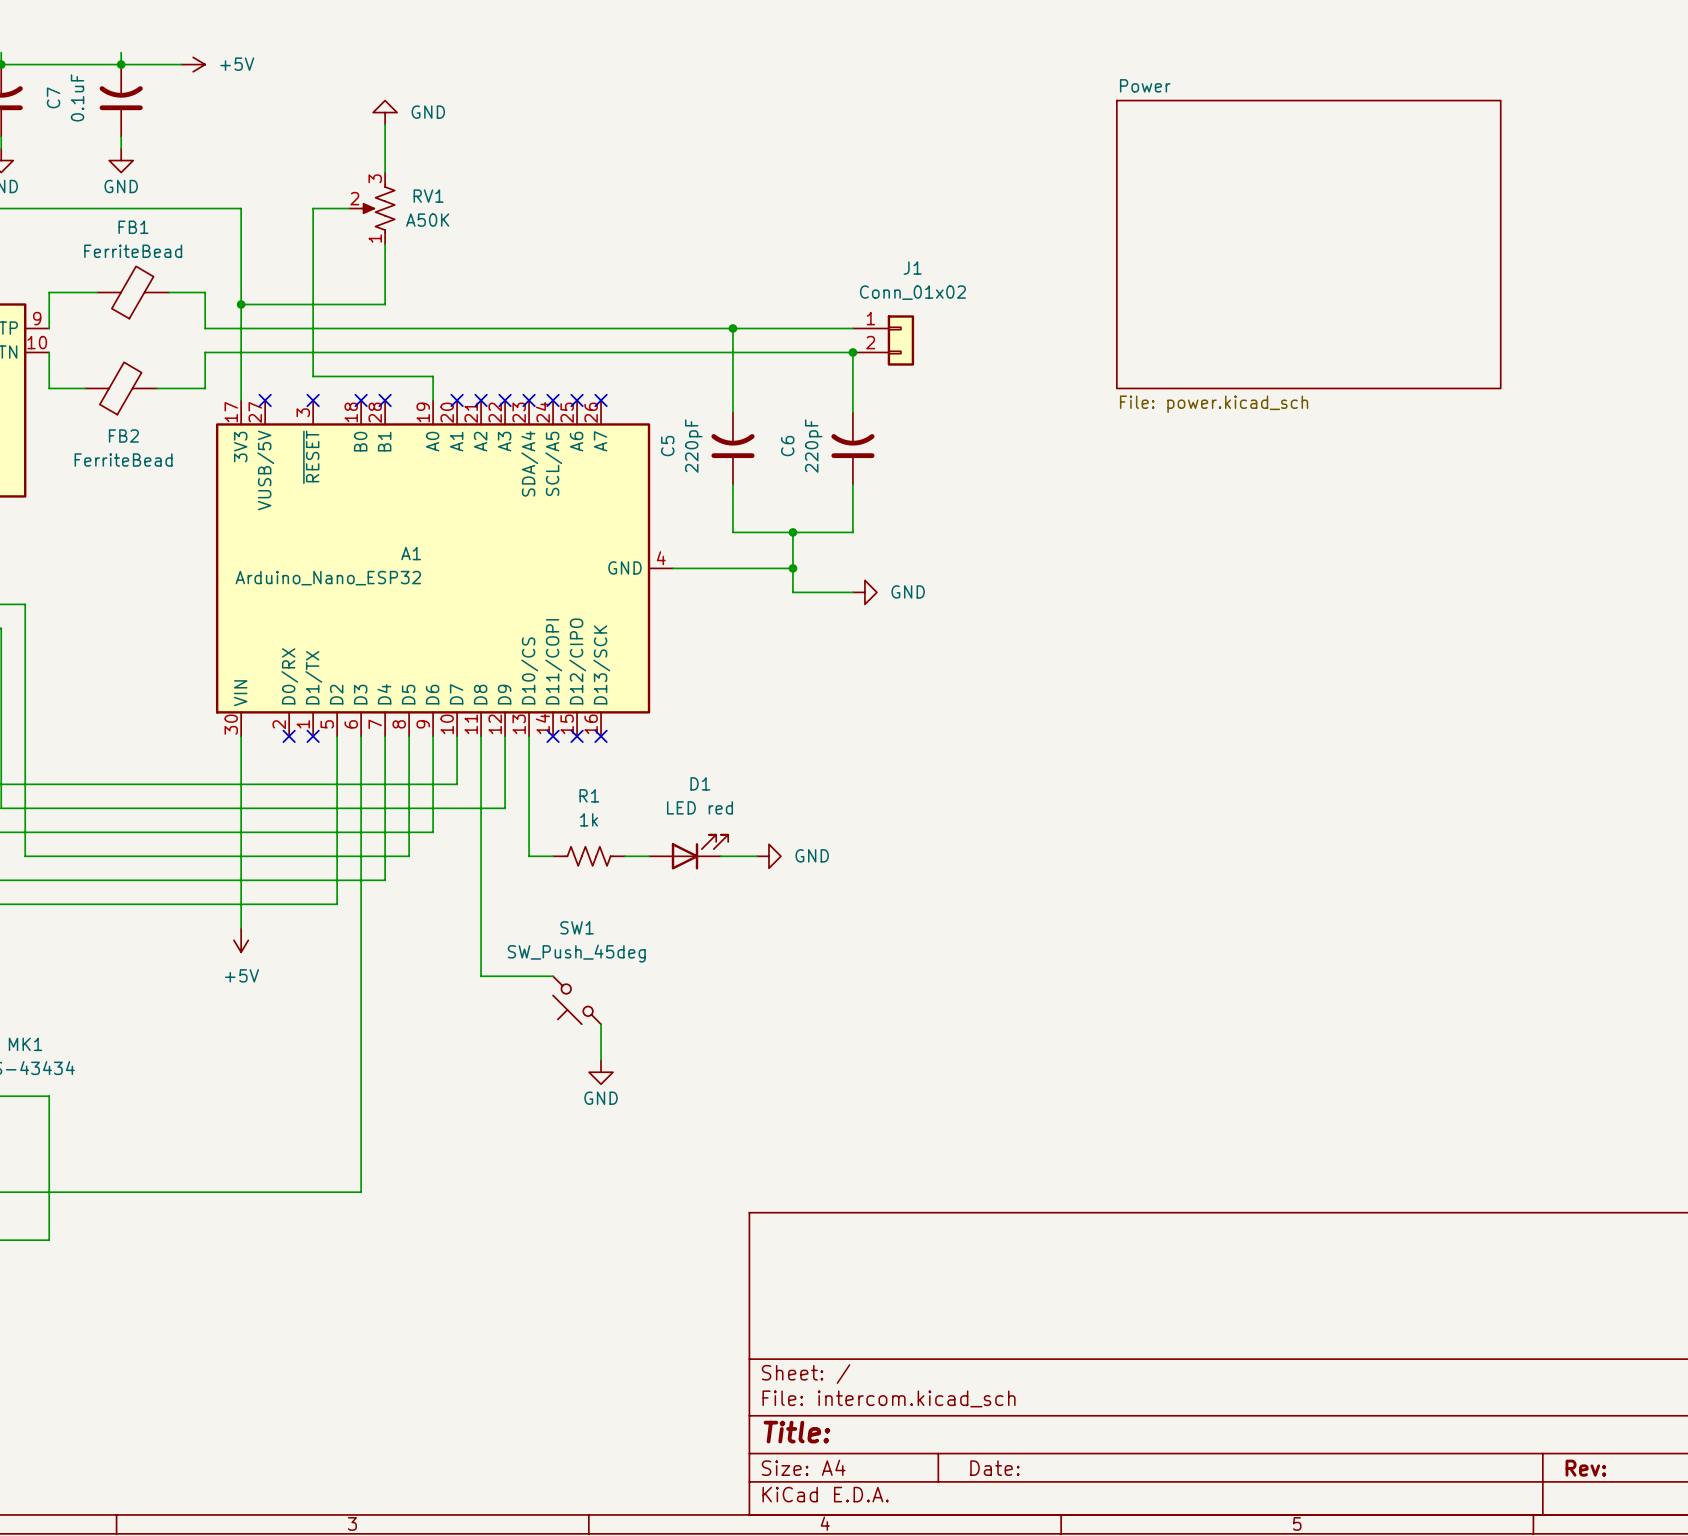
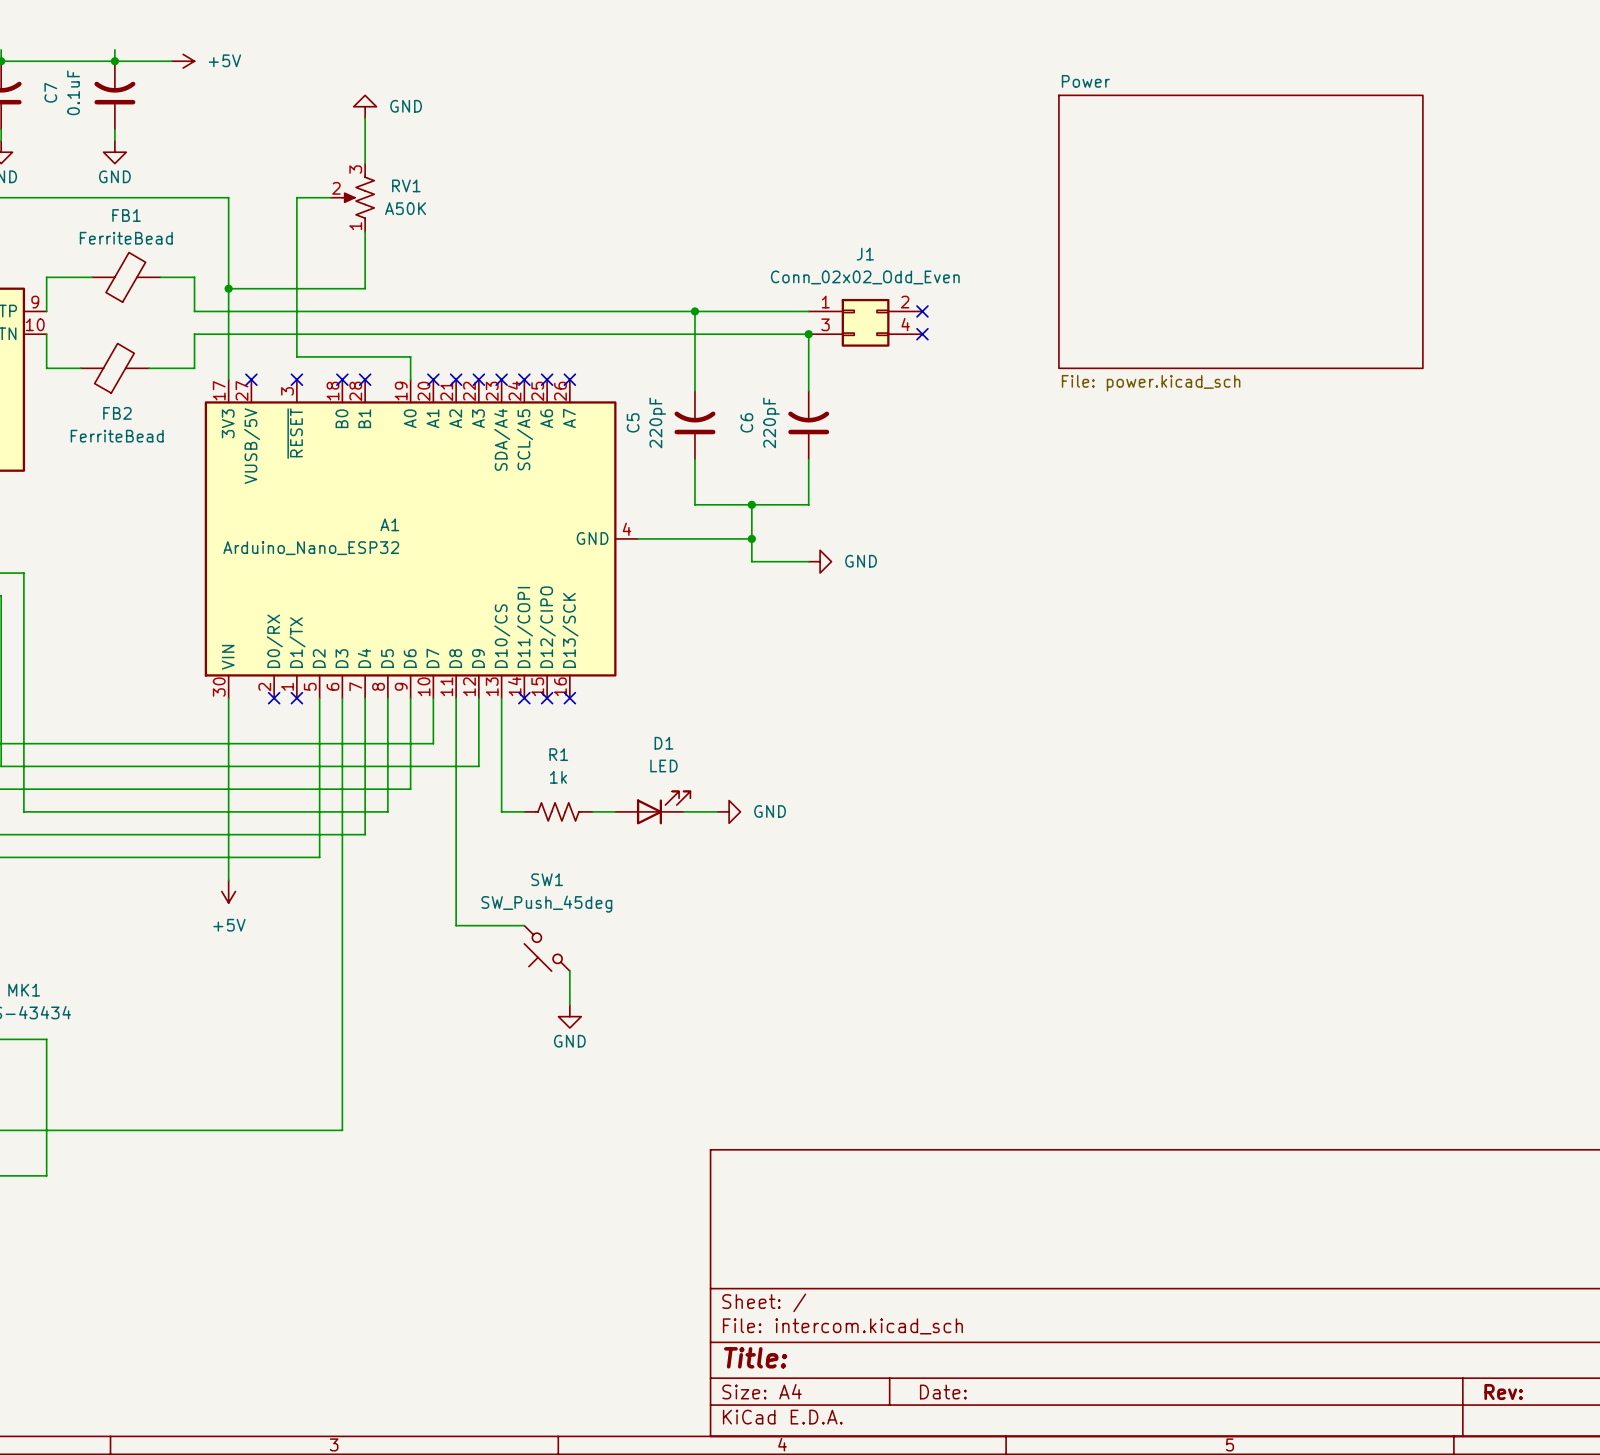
J1 value: Conn_01x02 (912, 292) -> Conn_02x02_Odd_Even (865, 277)
J1 symbol: [852, 315, 915, 366] -> [808, 298, 923, 347]
no-connect mark: none -> (922, 311)
no-connect mark: none -> (922, 334)
D1 value: LED red (699, 807) -> LED (663, 765)

